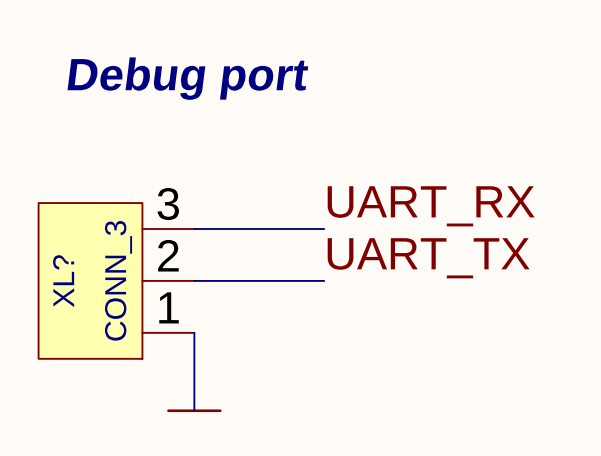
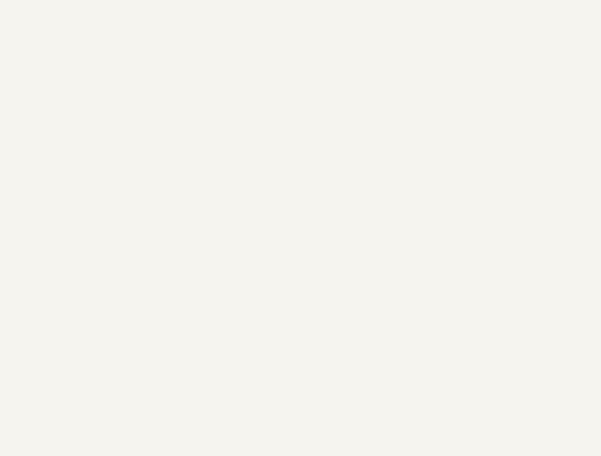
text: Debug port (187, 78) -> none
label: UART_RX (431, 206) -> none
wire: (194, 229) (324, 229) -> none
label: UART_TX (428, 258) -> none
XL?: CONN_3 (116, 280) -> none
wire: (194, 280) (324, 280) -> none
wire: (194, 332) (194, 410) -> none
power symbol: (194, 410) -> none

